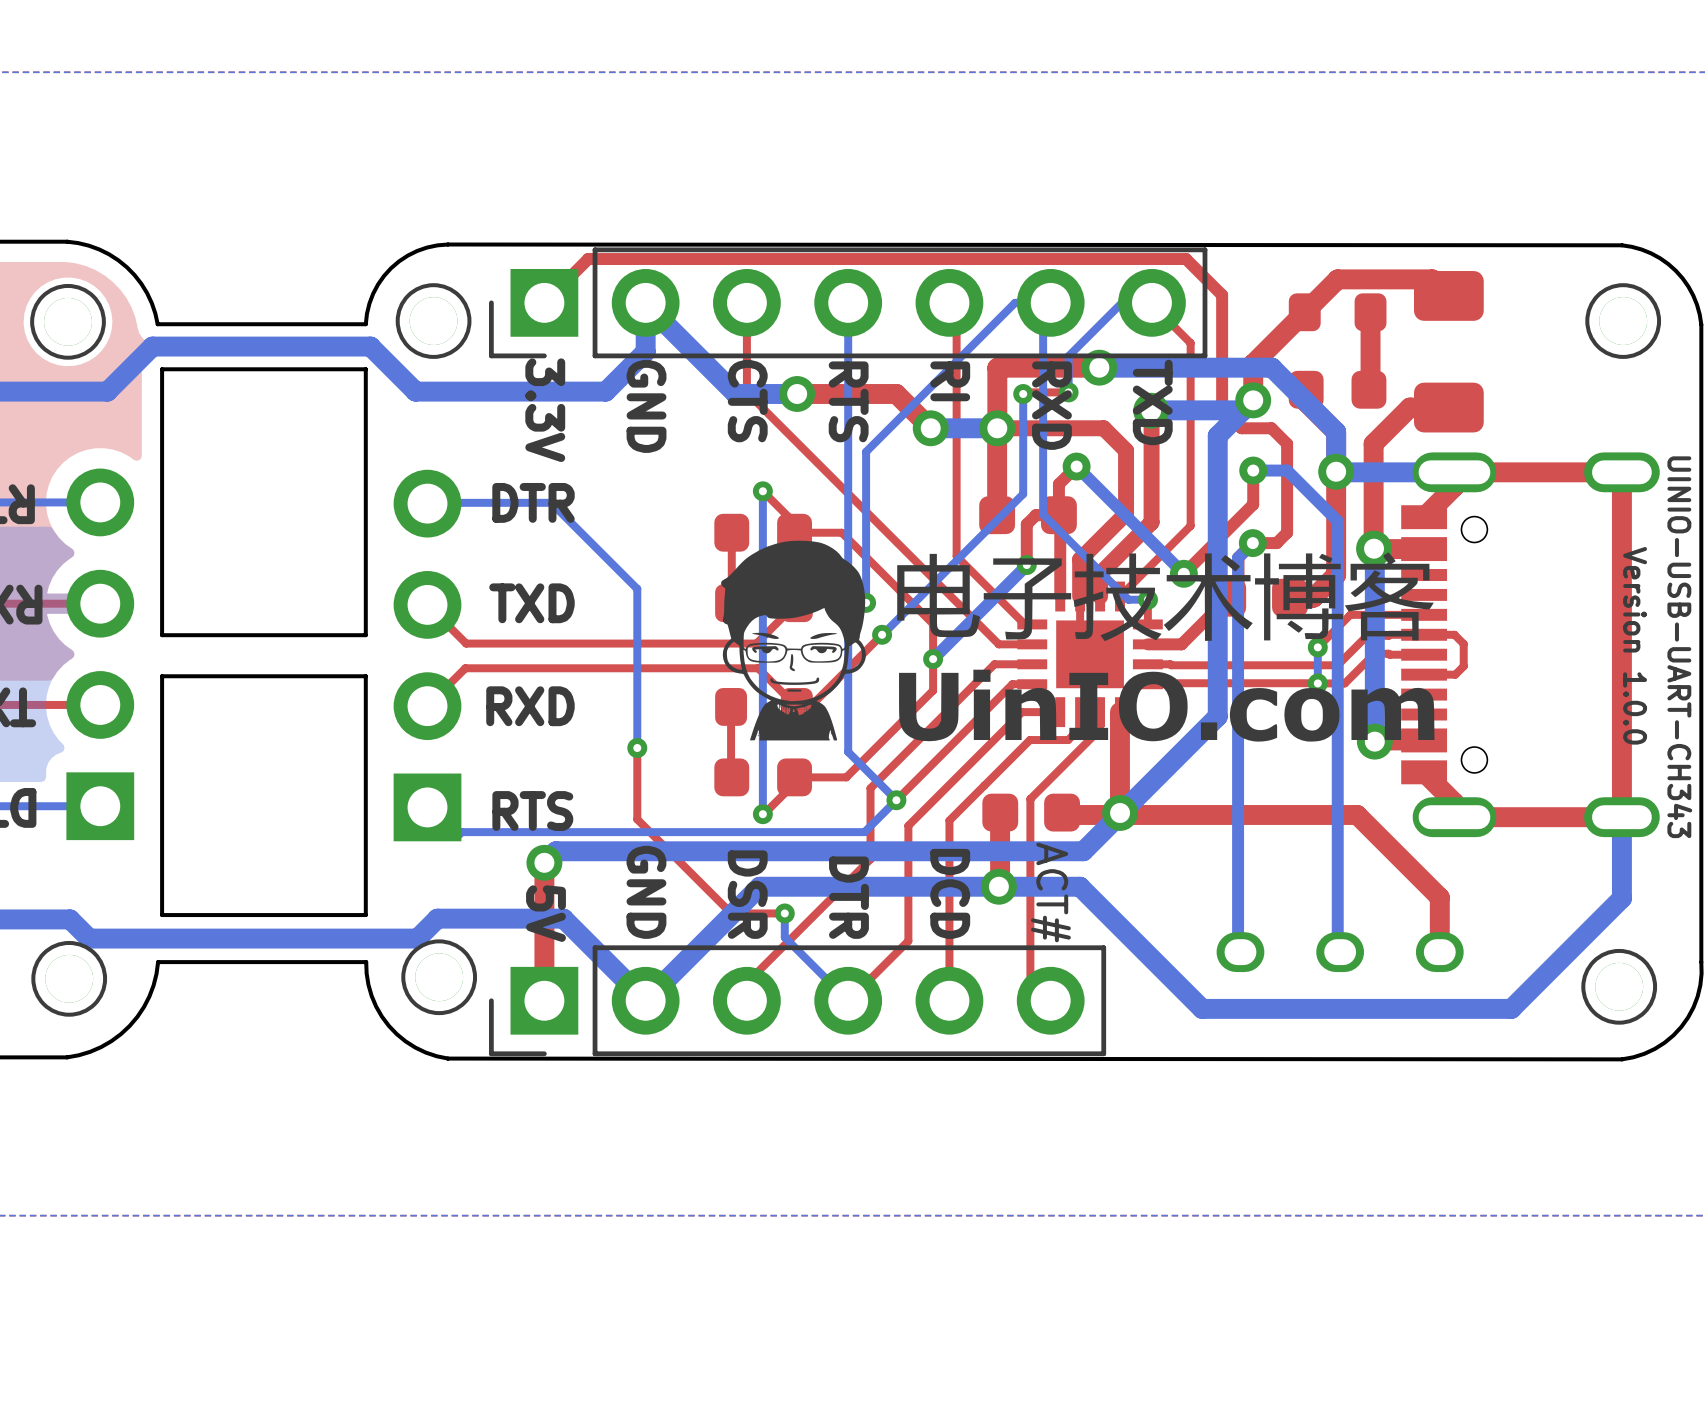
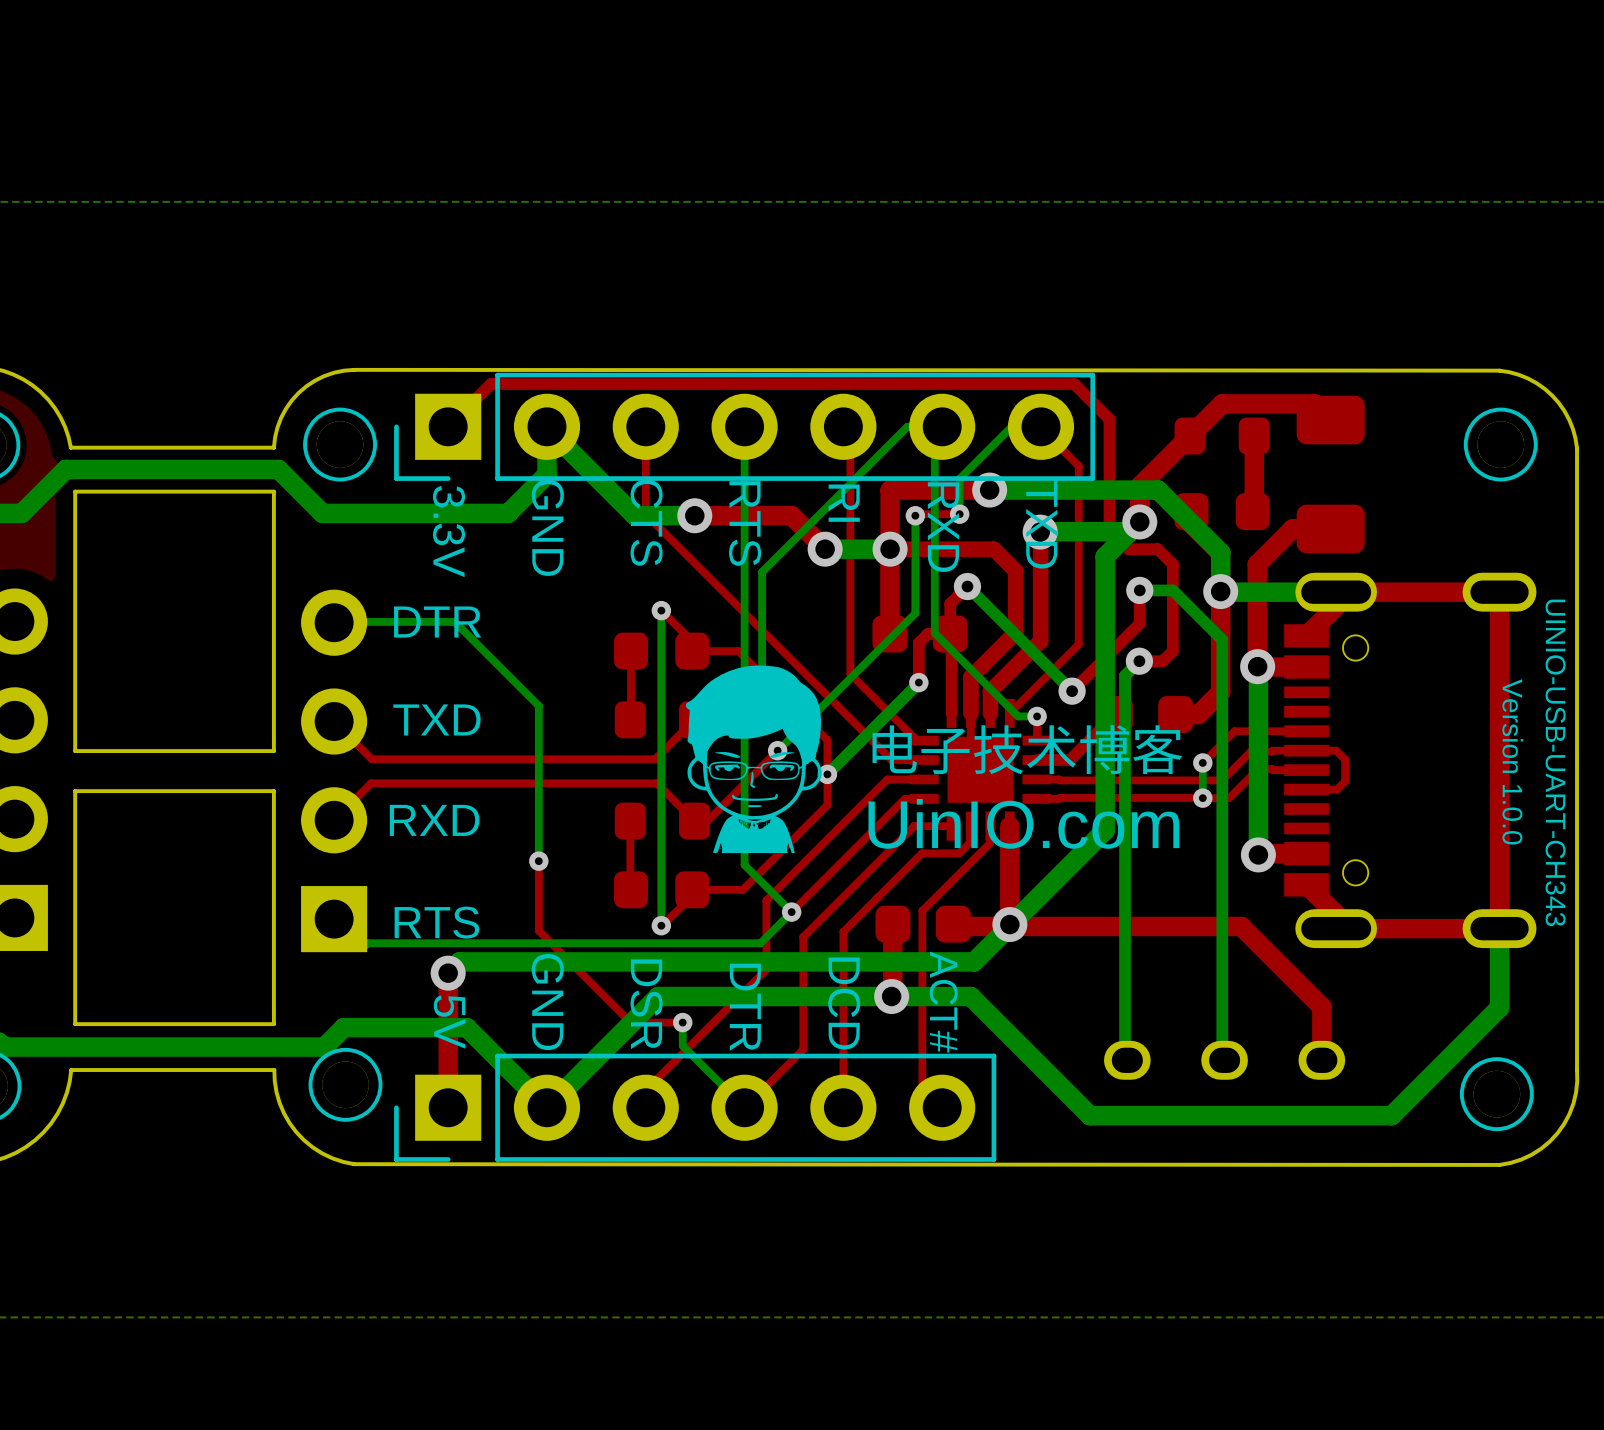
drawing: [721, 540, 1435, 742] -> none
drawing: none -> [685, 665, 822, 854]
text: none -> 电子技术博客 (1027, 749)
text: none -> UinIO.com (1023, 823)

